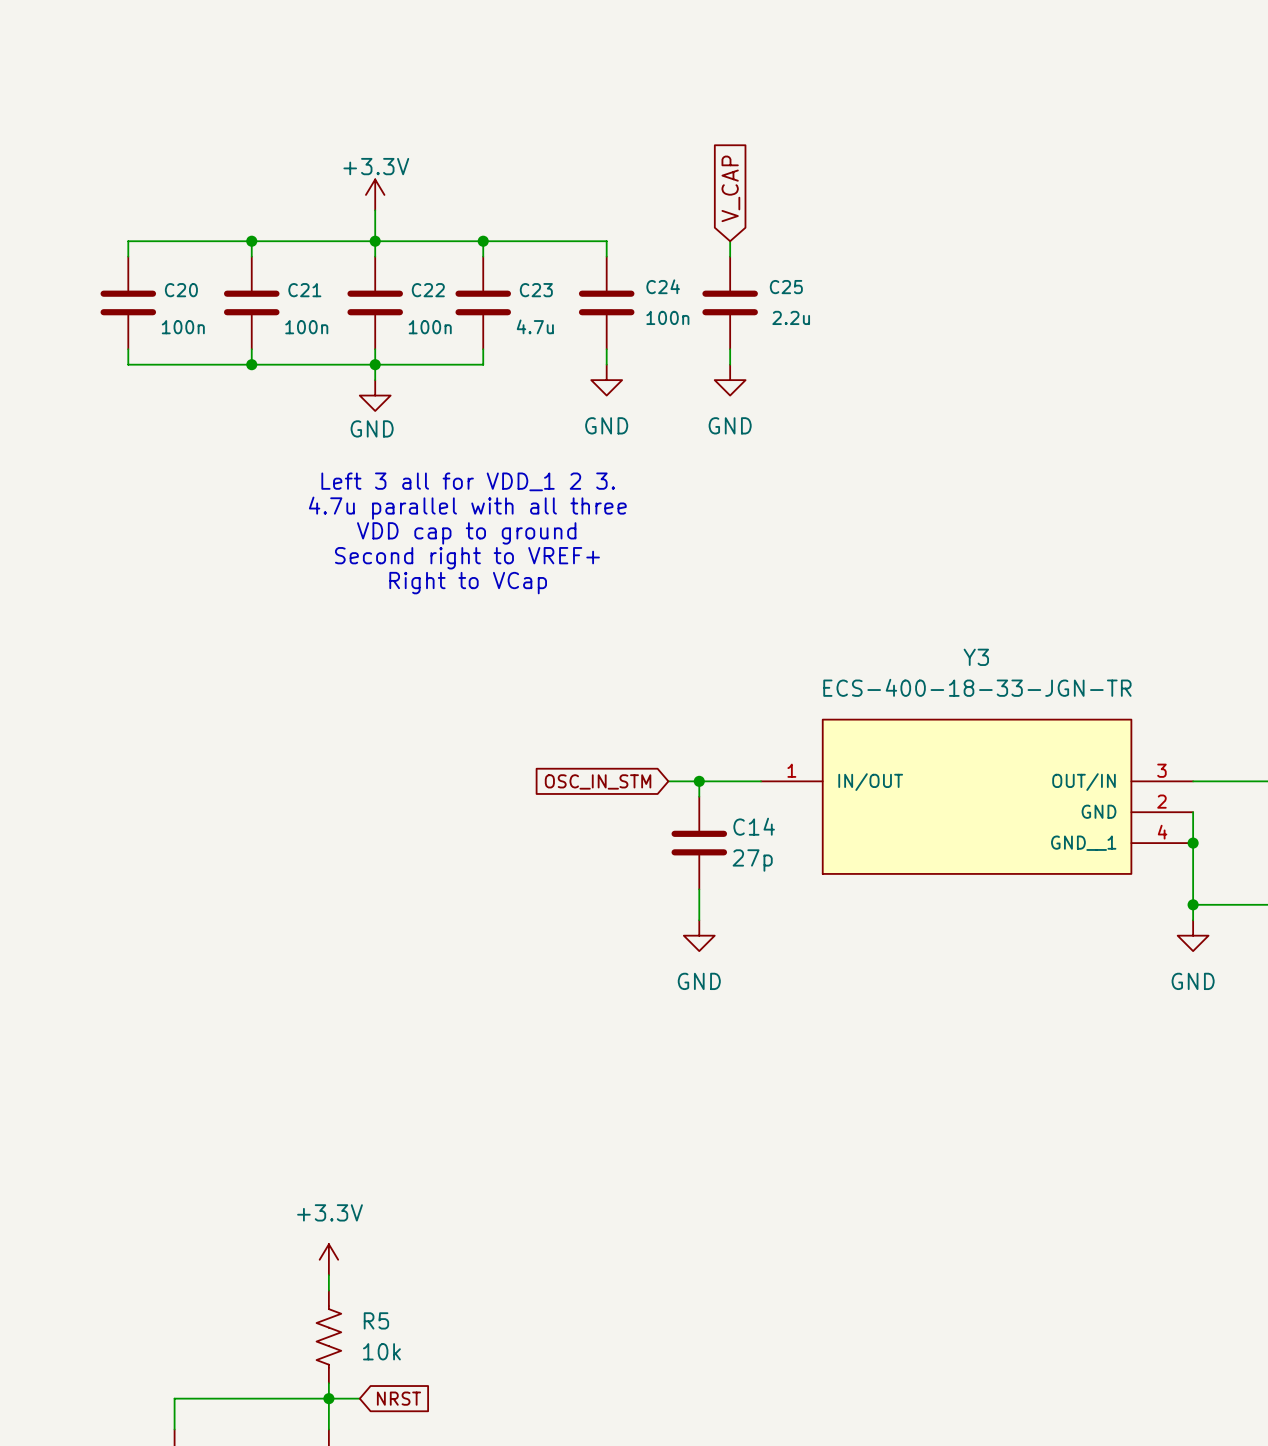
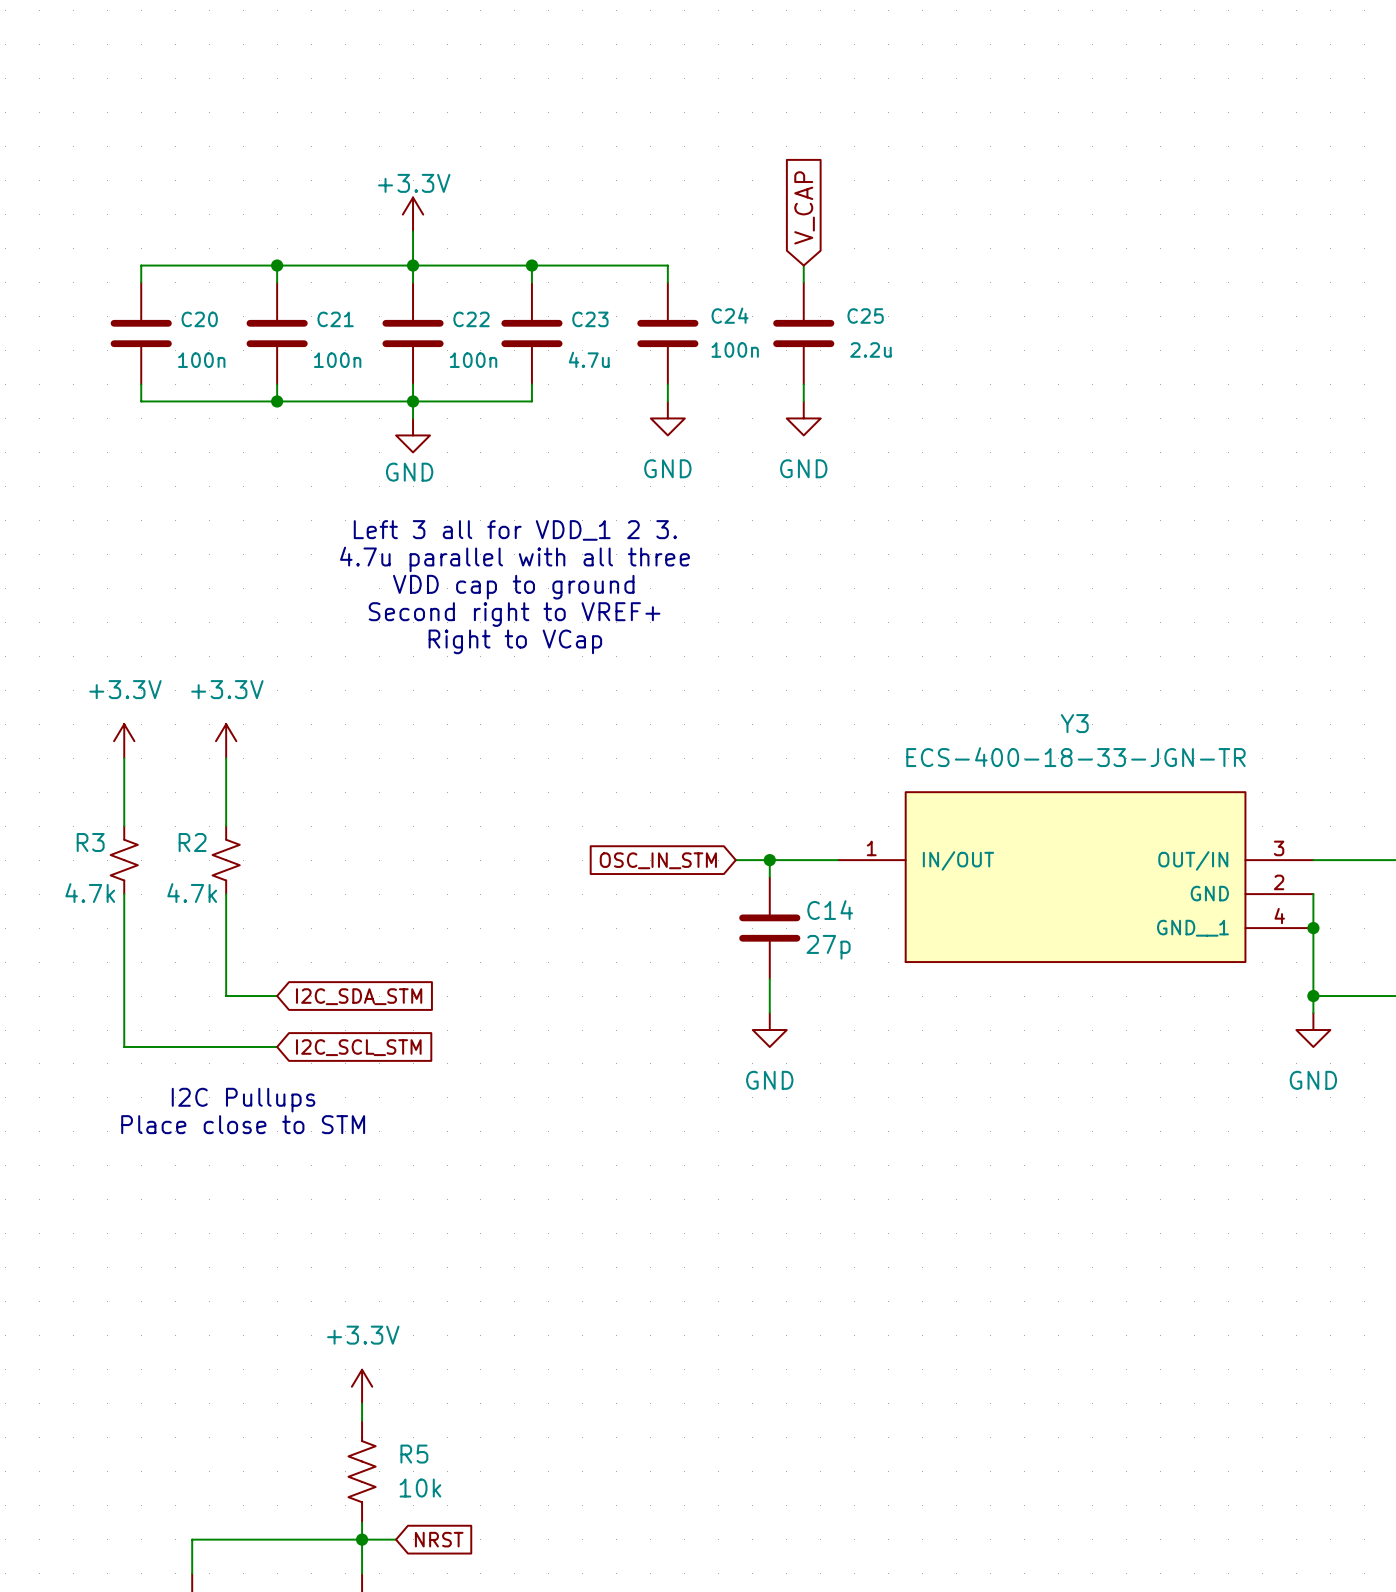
power symbol: none -> +3.3V (124, 741)
power symbol: none -> +3.3V (226, 741)
wire: none -> (124, 758) (124, 826)
wire: none -> (226, 758) (226, 826)
R3: none -> 4.7k (124, 860)
R2: none -> 4.7k (226, 860)
wire: none -> (124, 894) (124, 1046) (277, 1046)
wire: none -> (226, 894) (226, 996) (277, 996)
global label: none -> I2C_SDA_STM (359, 996)
global label: none -> I2C_SCL_STM (358, 1047)
text: none -> I2C Pullups (243, 1100)
text: none -> Place close to STM (243, 1124)

